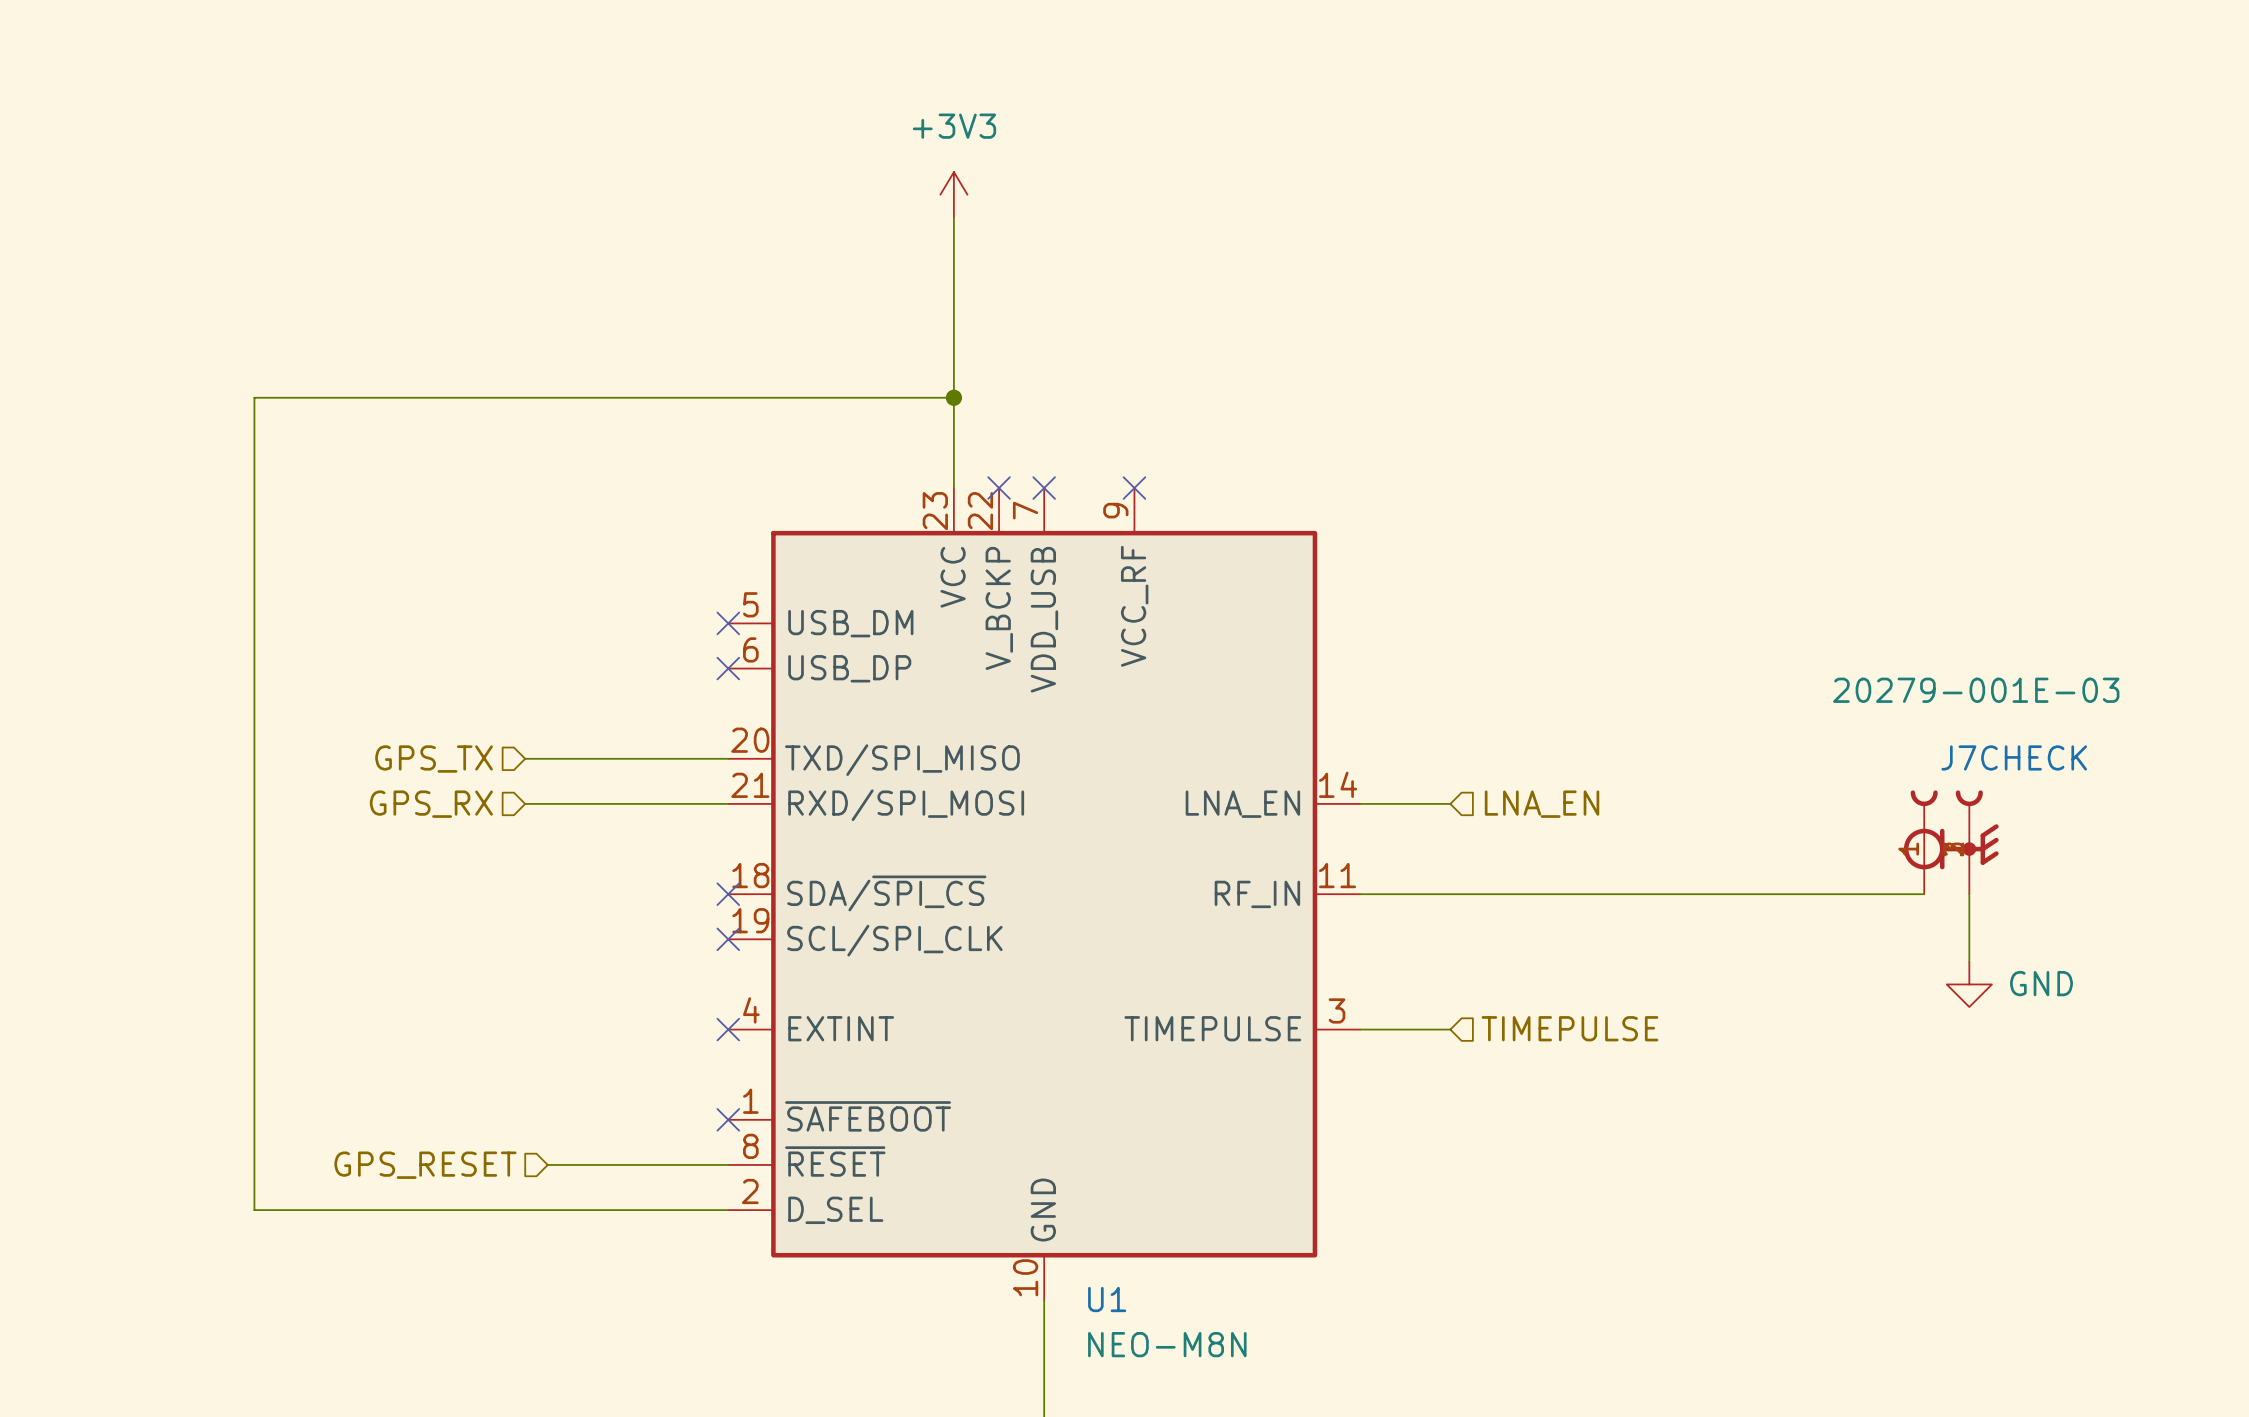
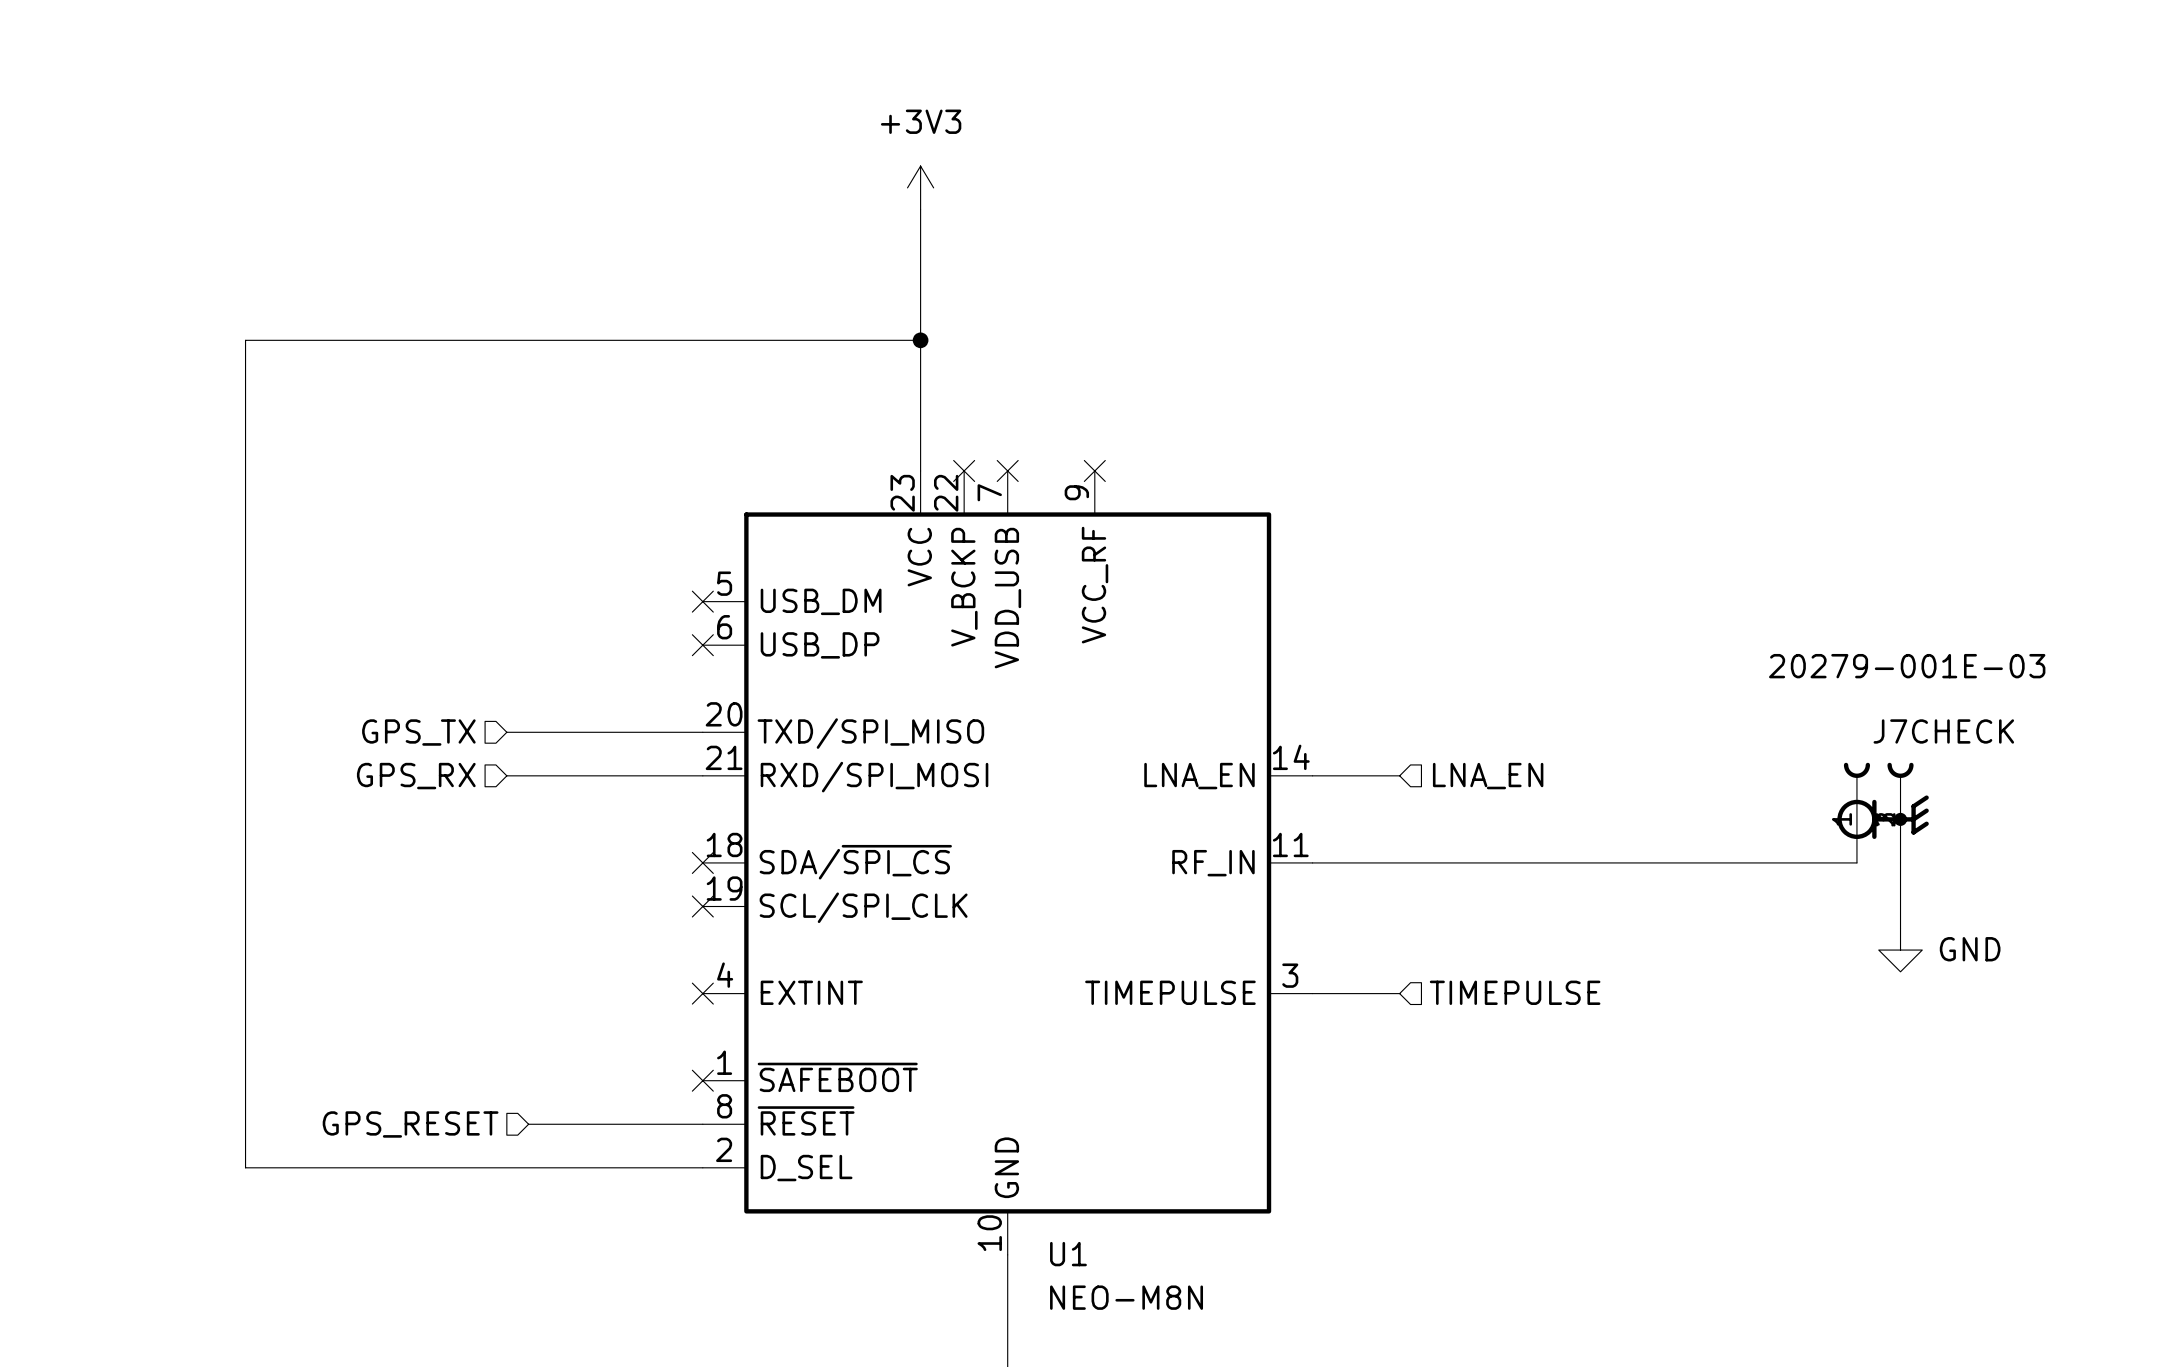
wire: (254, 397) (953, 397) -> (245, 383) (245, 340) (920, 340)
junction position: (953, 397) -> (920, 340)

